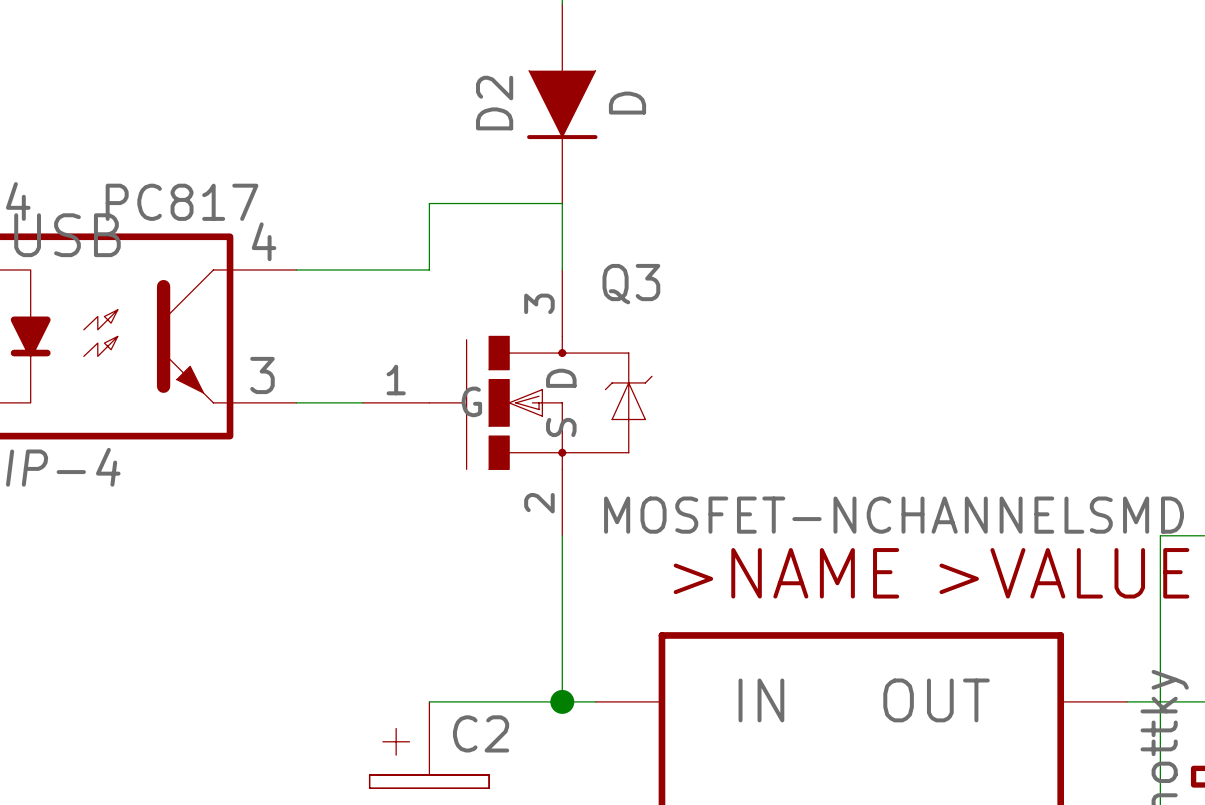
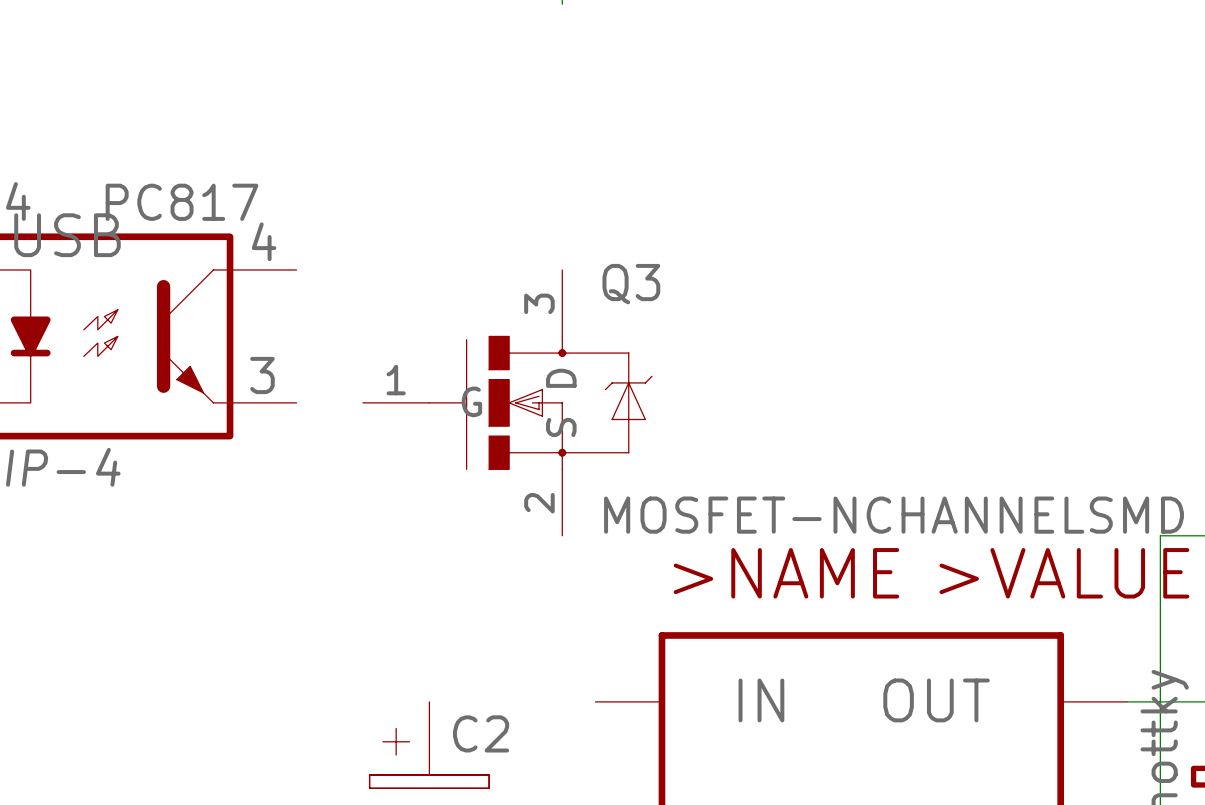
D2: D (562, 103) -> none
wire: (296, 269) (429, 269) (429, 203) (562, 203) (562, 269) -> none
wire: (296, 402) (362, 402) -> none
wire: (562, 535) (562, 701) -> none
wire: (429, 701) (595, 701) -> none
junction: (562, 701) -> none

